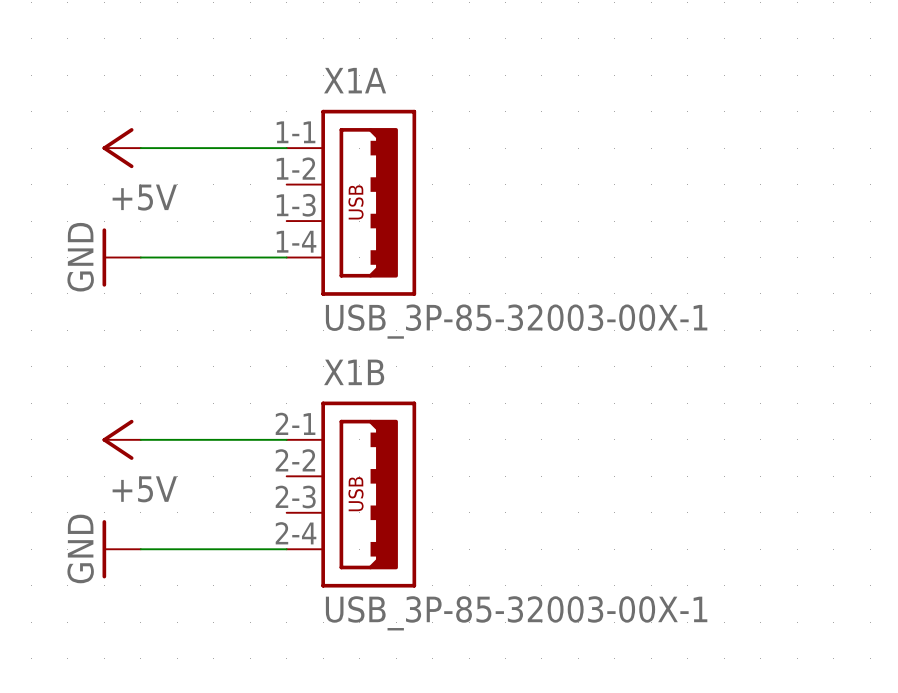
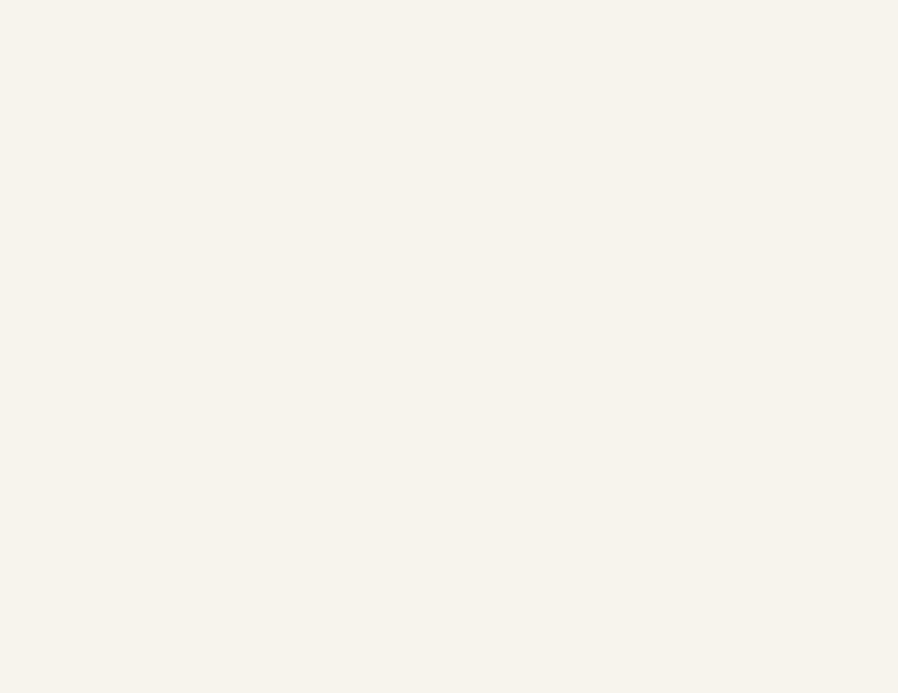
power symbol: +5V (121, 148) -> none
wire: (140, 148) (286, 148) -> none
X1A: USB_3P-85-32003-00X-1 (351, 202) -> none
power symbol: GND (121, 257) -> none
wire: (140, 257) (286, 257) -> none
power symbol: +5V (121, 439) -> none
wire: (140, 439) (286, 439) -> none
X1B: USB_3P-85-32003-00X-1 (351, 494) -> none
power symbol: GND (121, 549) -> none
wire: (140, 549) (286, 549) -> none

